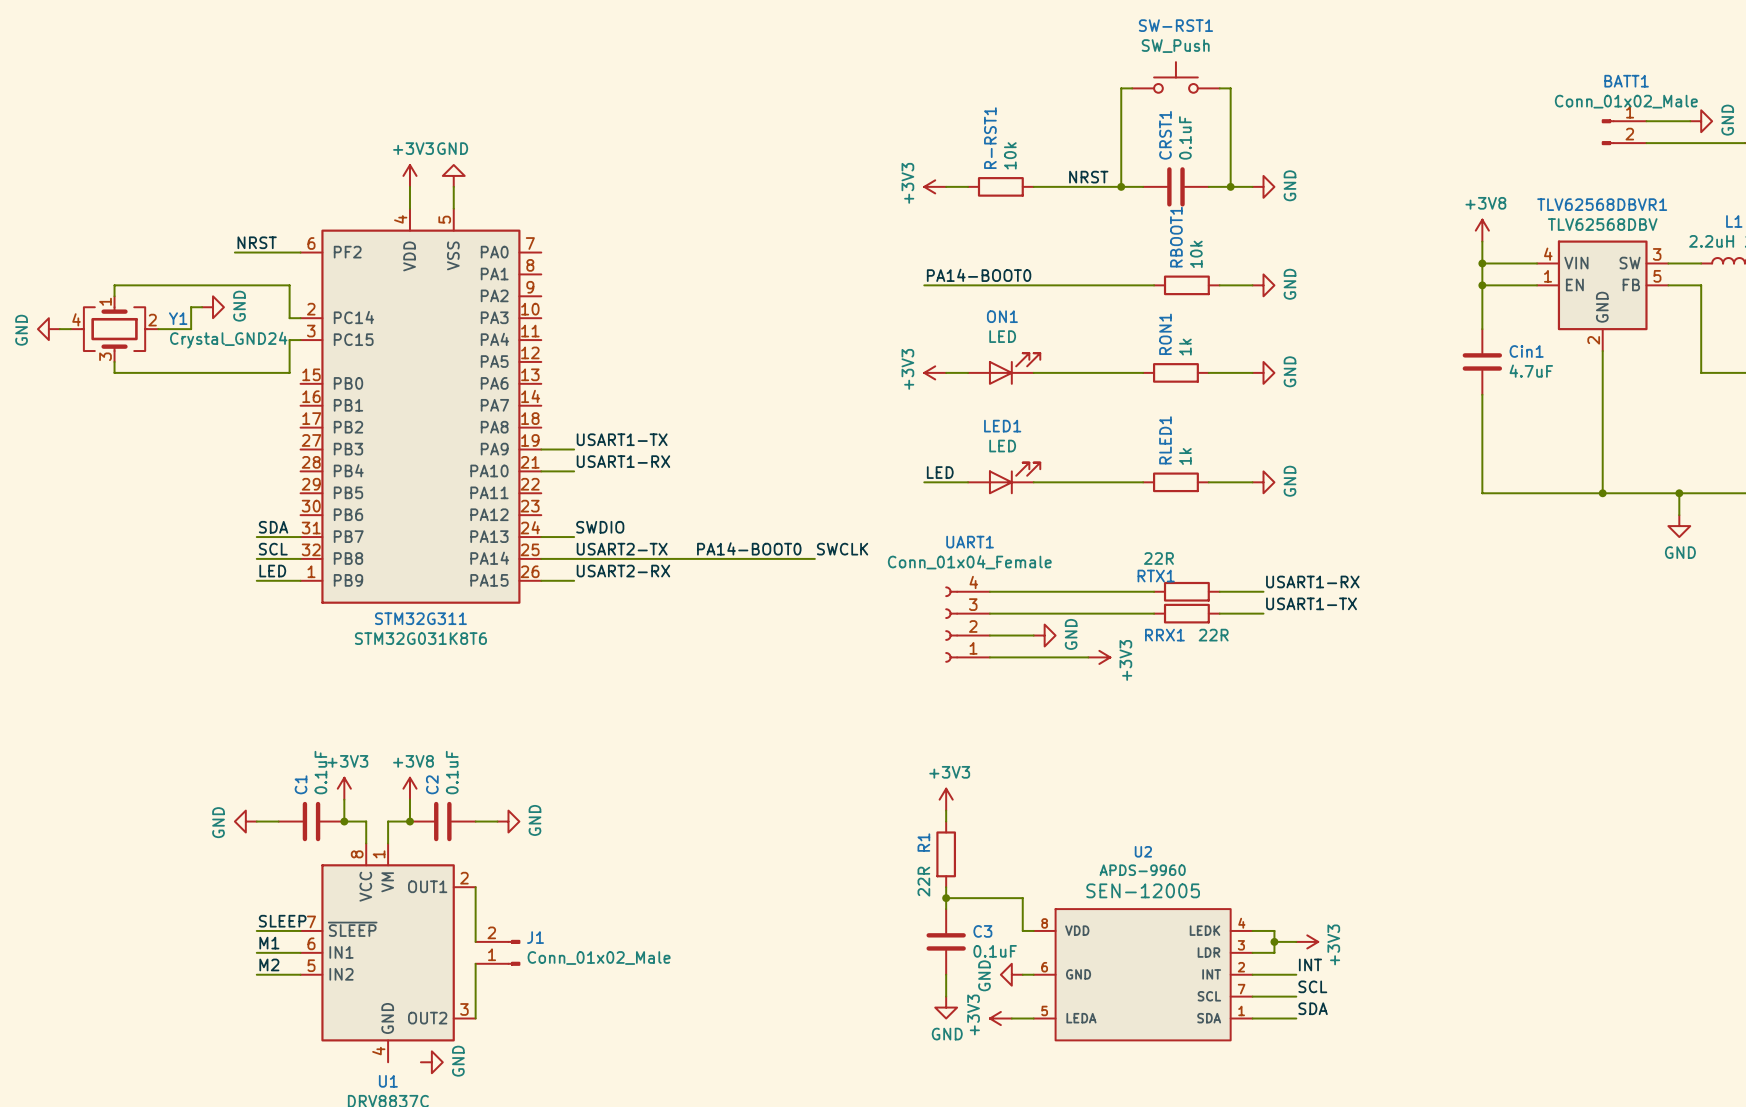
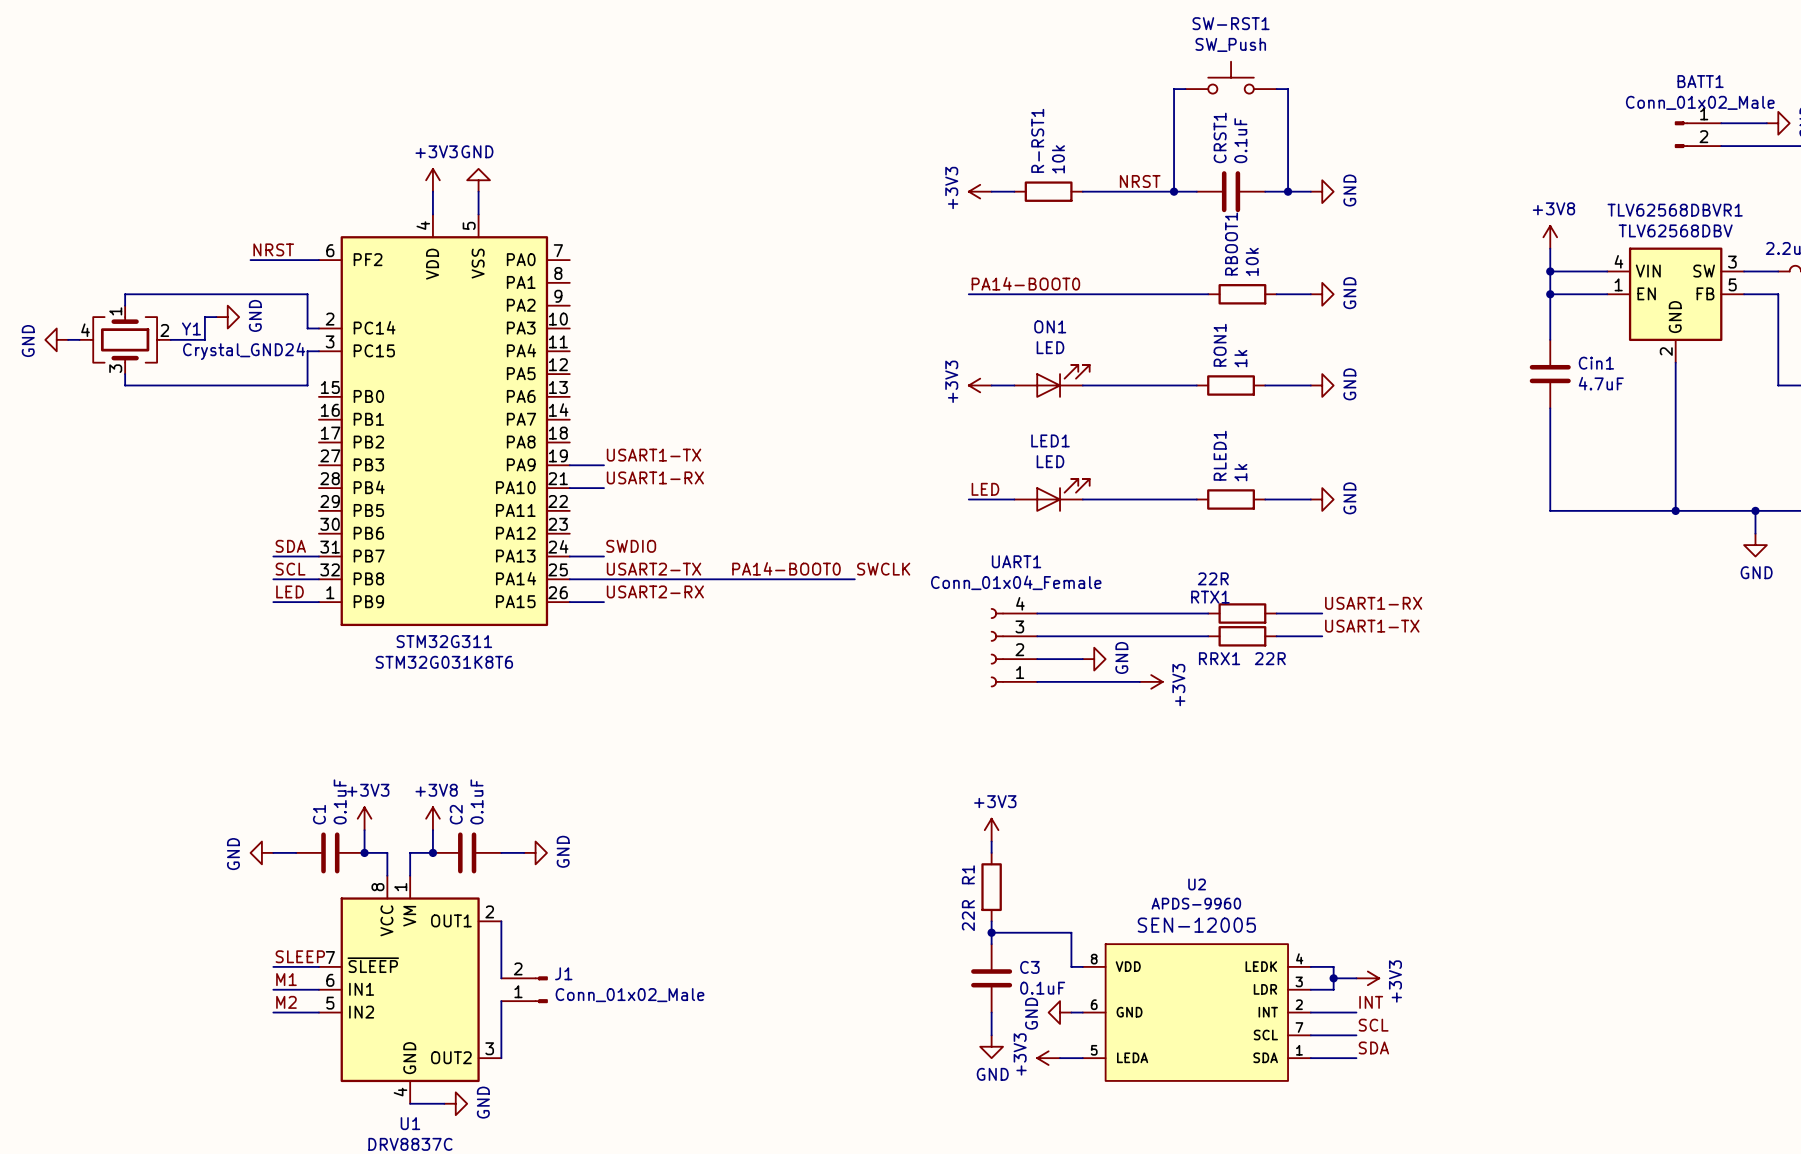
wire: none -> (410, 1103) (444, 1103)

